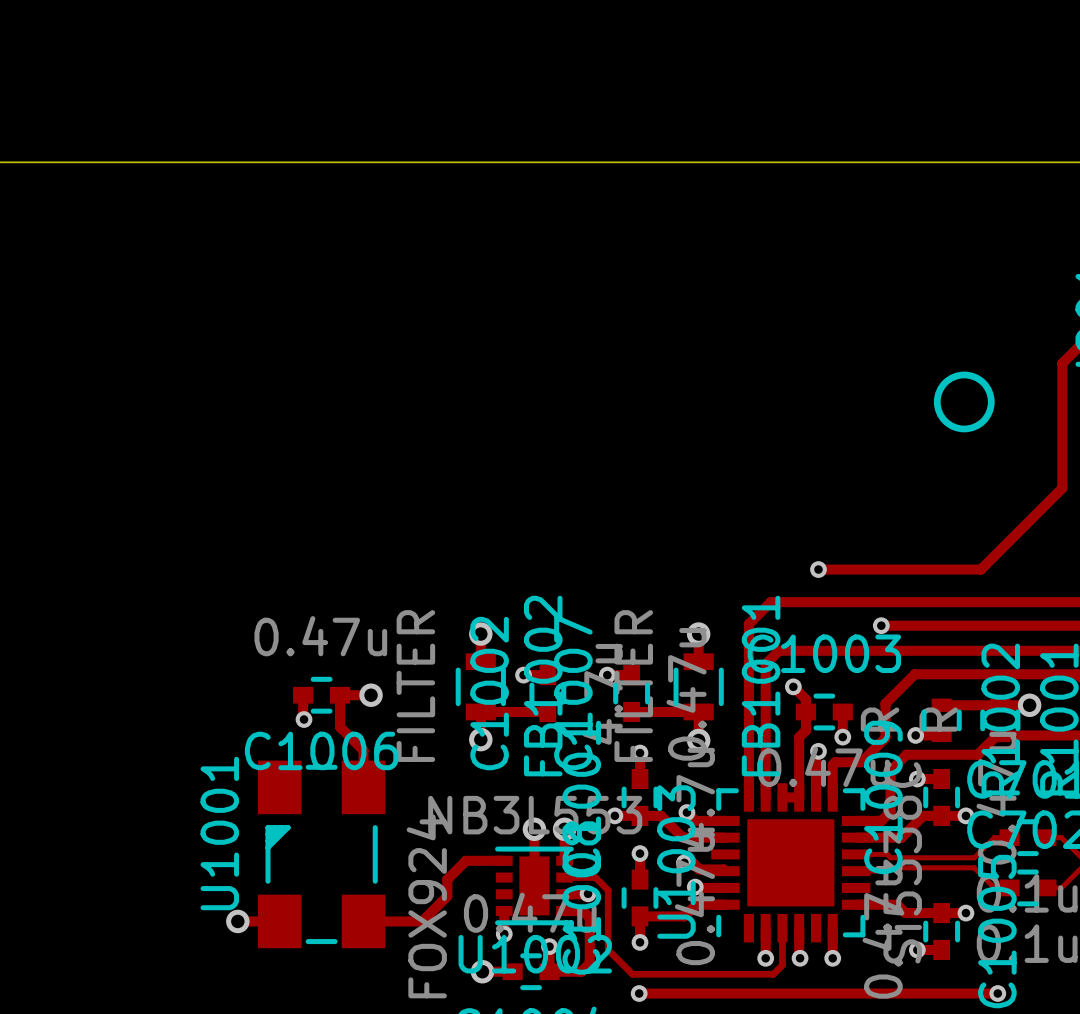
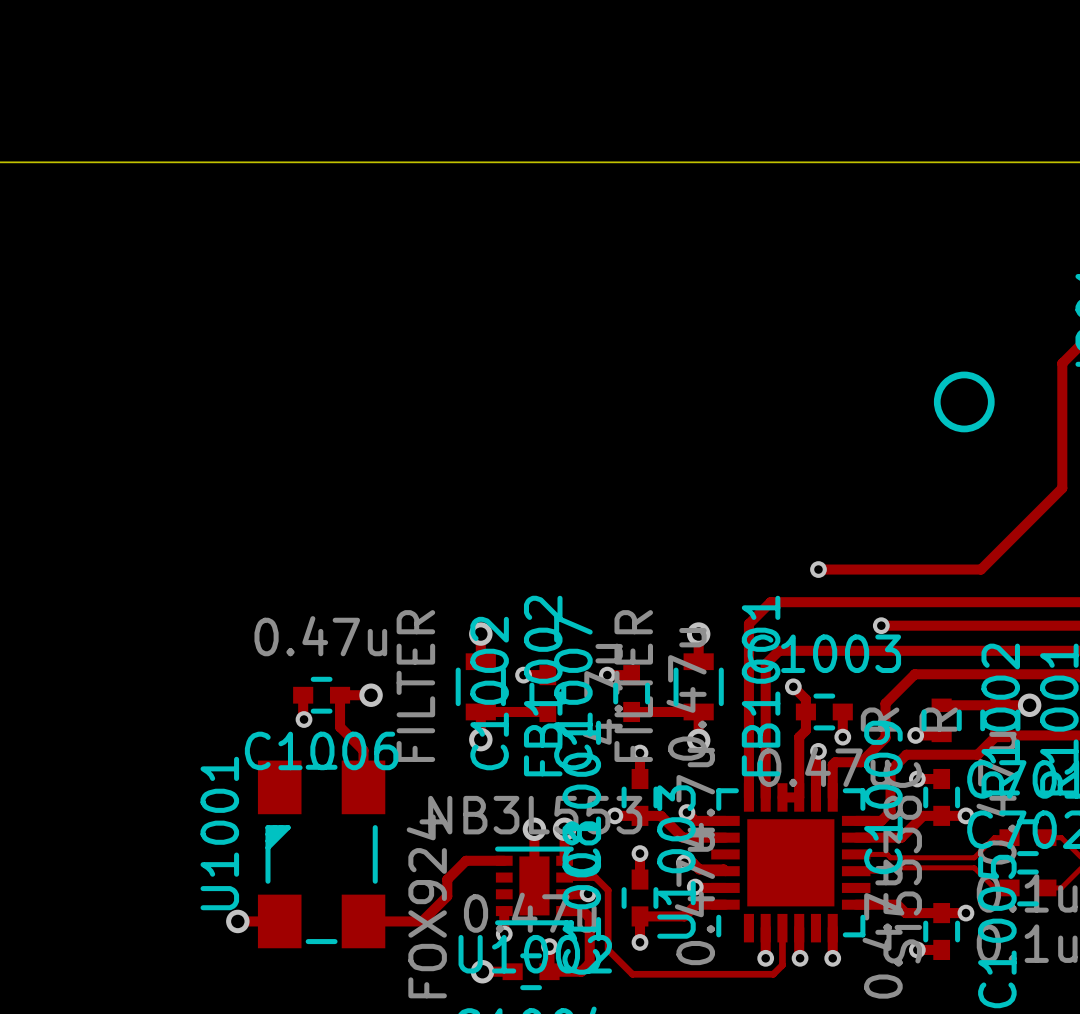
track: (639, 993) (997, 993) -> none
via: (639, 993) -> none
via: (997, 993) -> none

